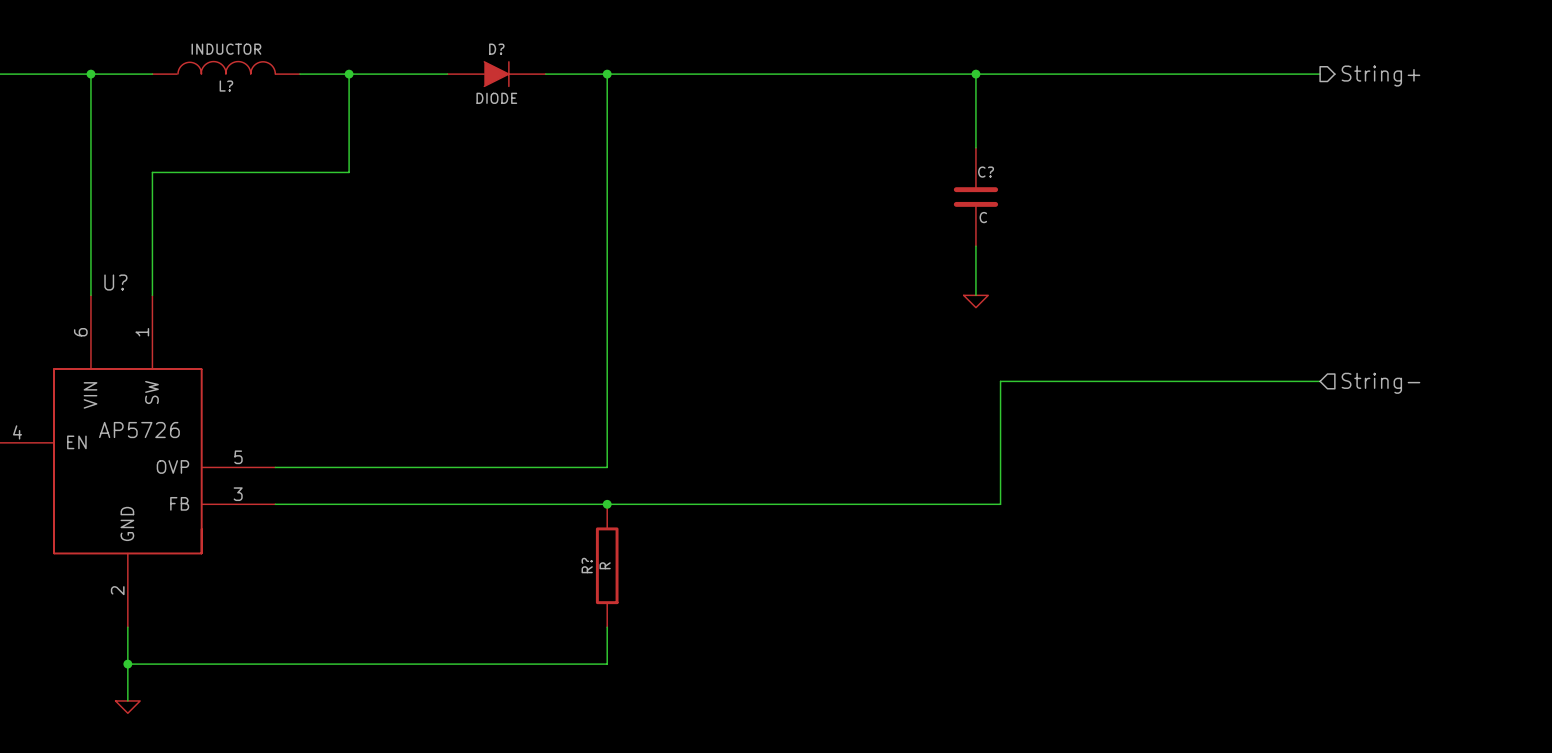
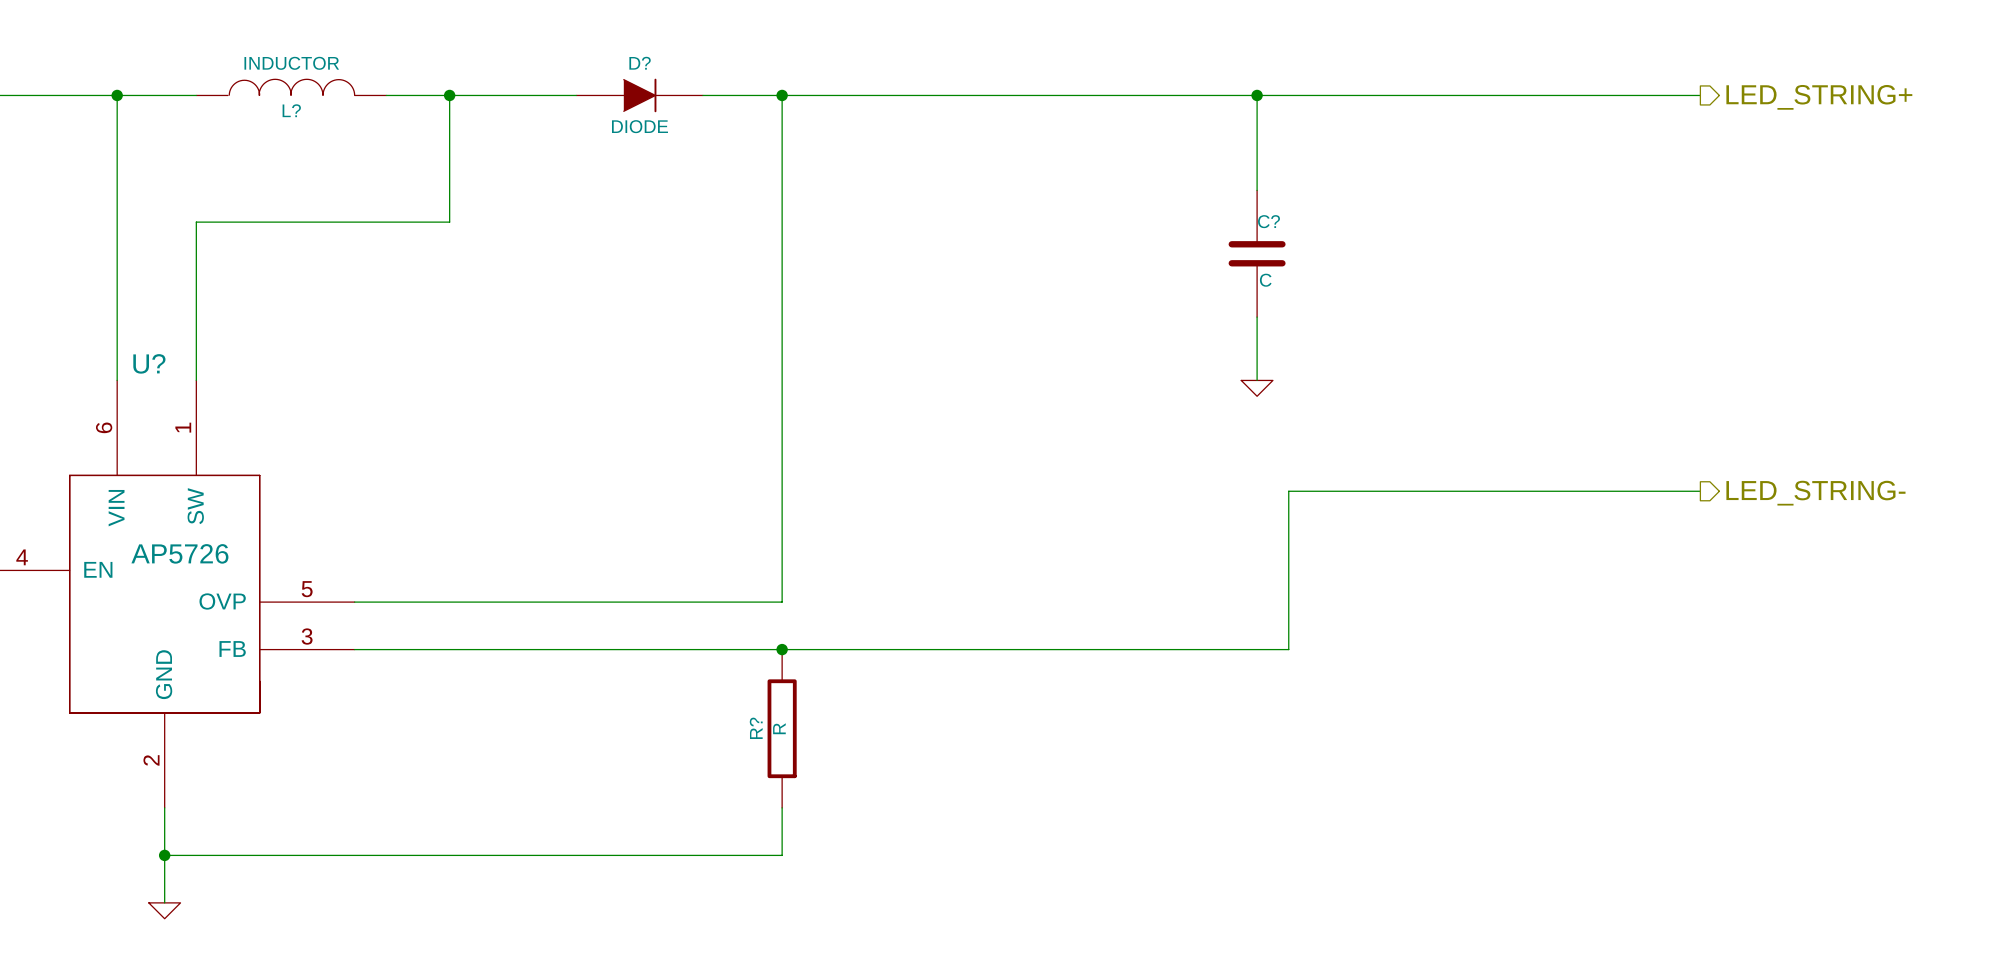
hierarchical label: String+ (1380, 76) -> LED_STRING+ (1819, 97)
hierarchical label shape: input (1380, 383) -> output (1815, 493)
hierarchical label: String- (1380, 383) -> LED_STRING- (1815, 493)

